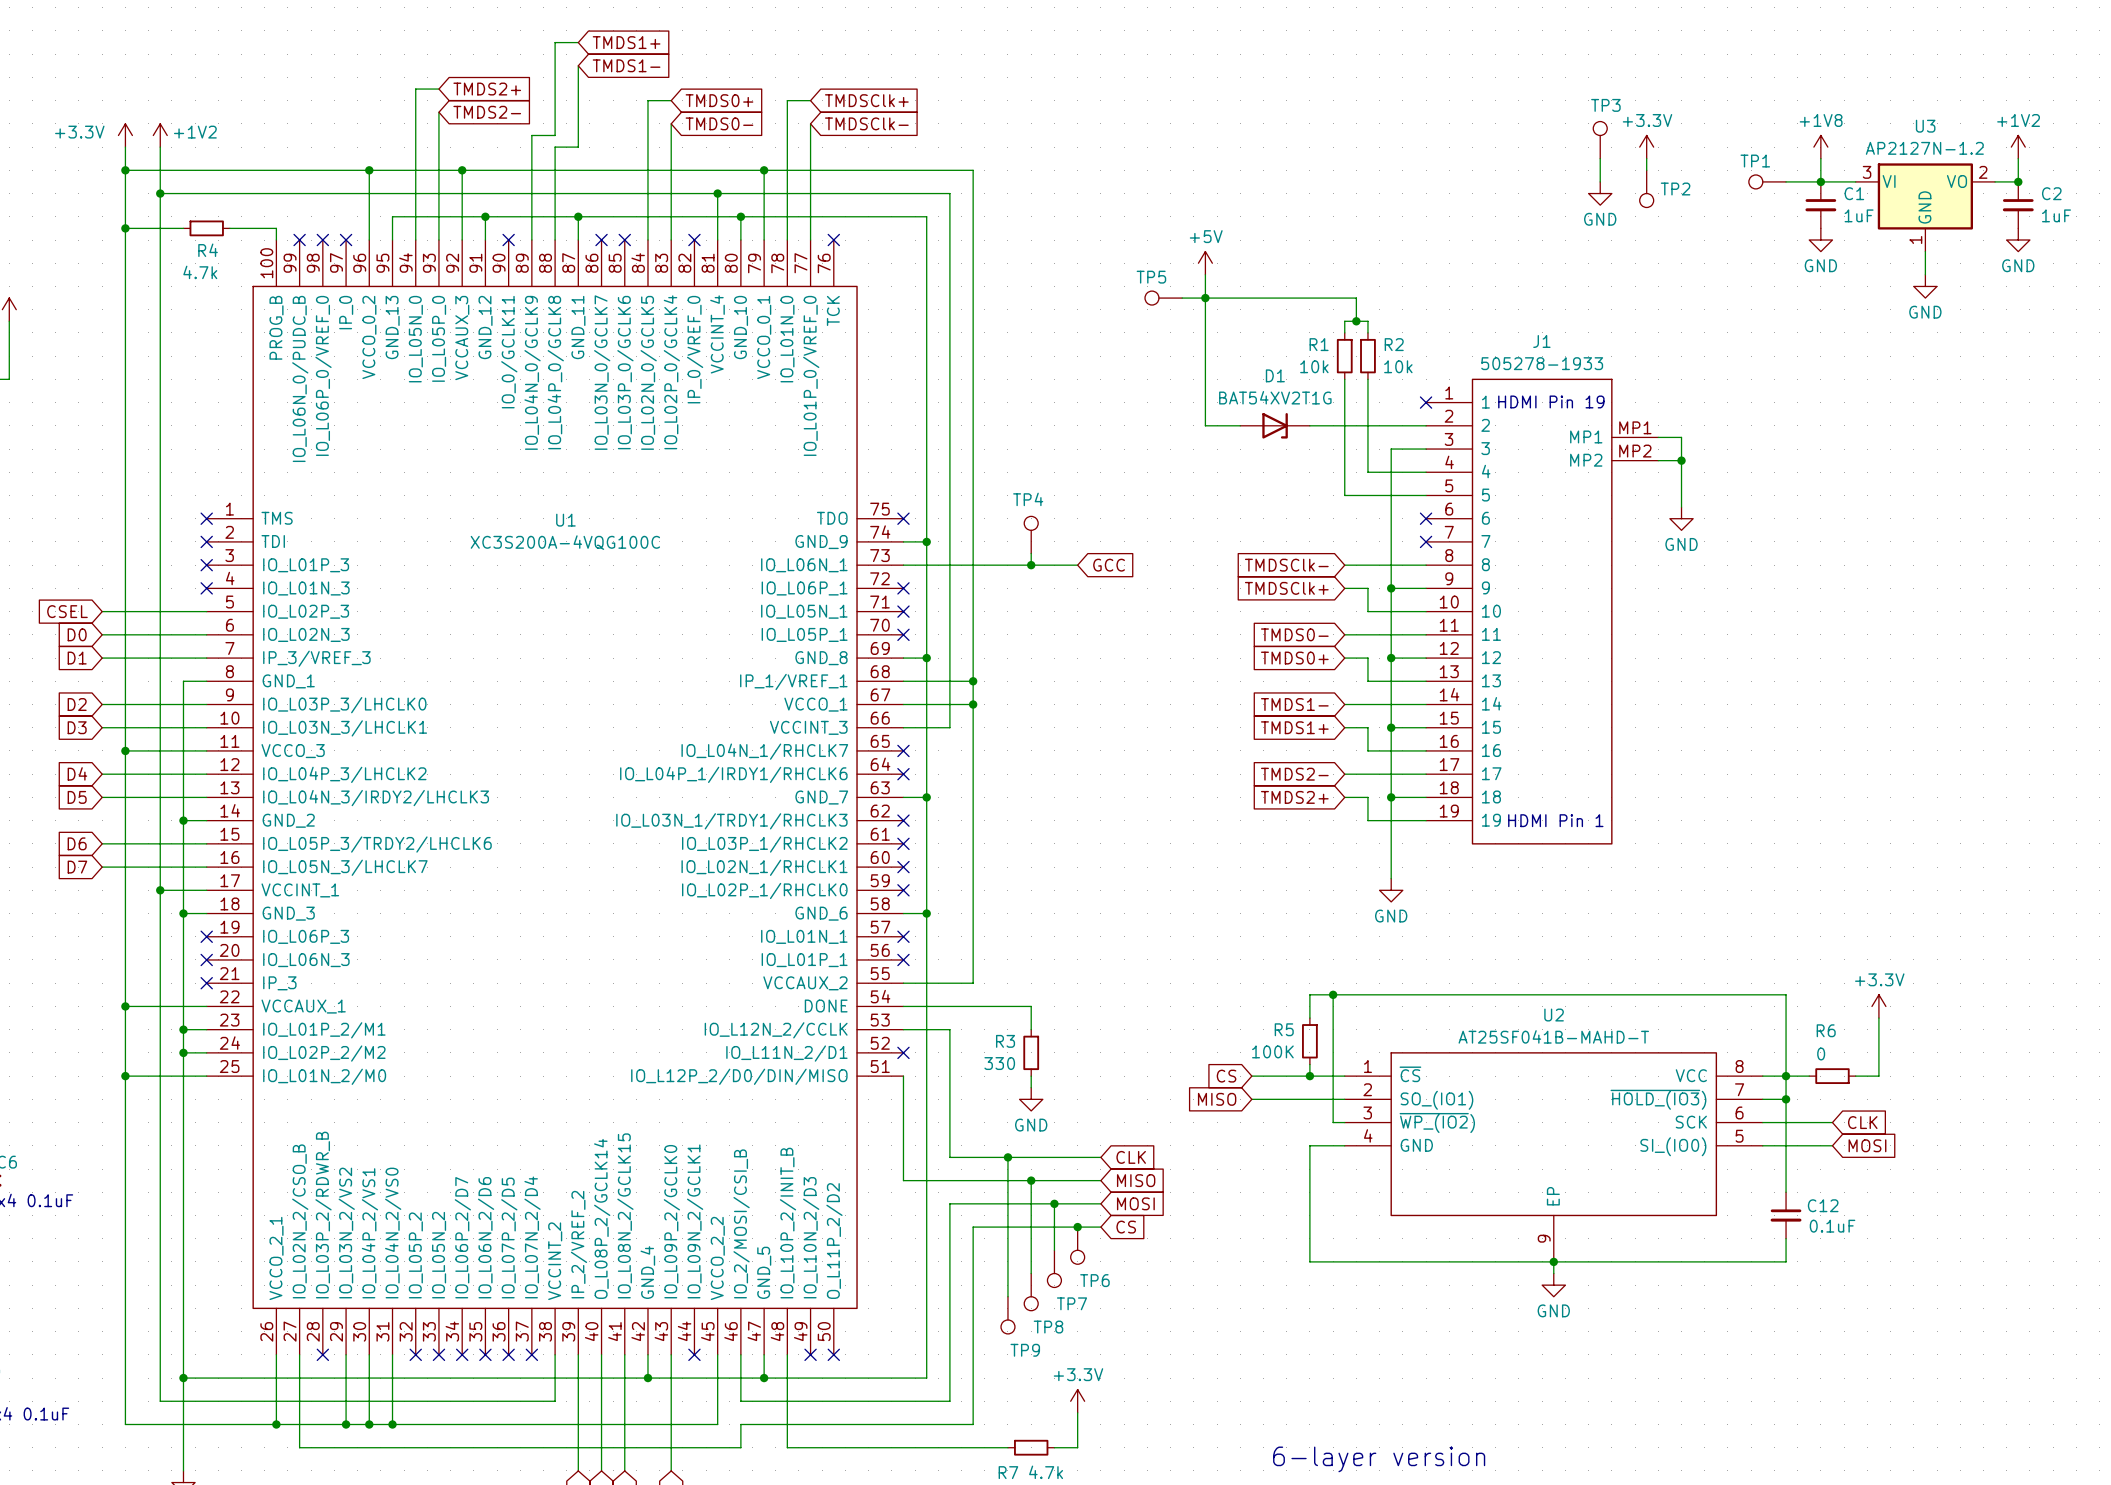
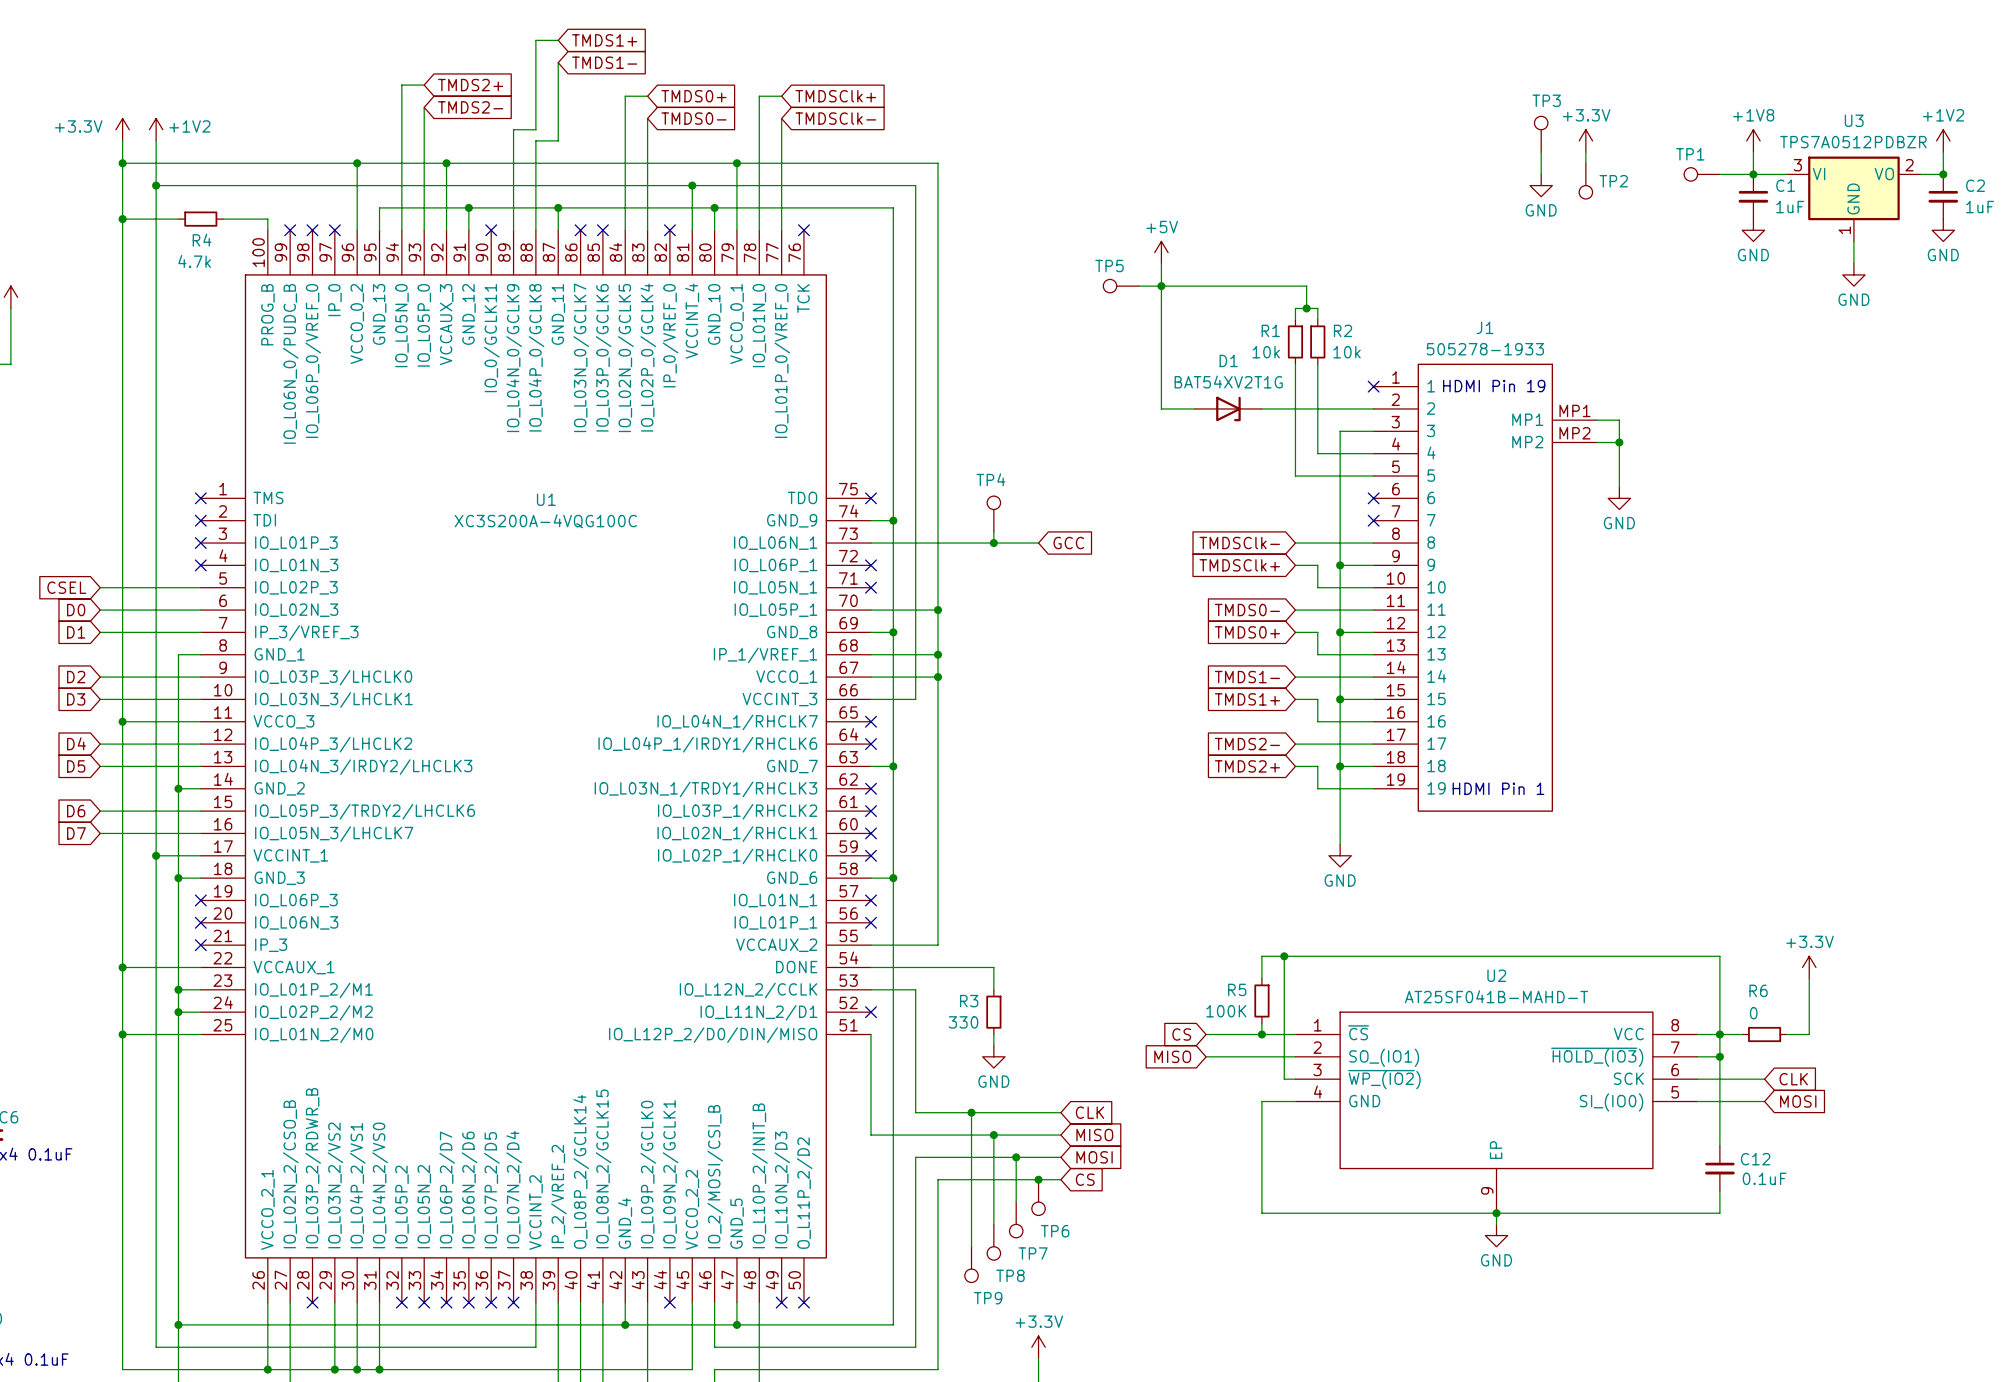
U3 value: AP2127N-1.2 (1924, 148) -> TPS7A0512PDBZR (1853, 142)
wire: none -> (870, 610) (938, 610)
no-connect mark: (903, 634) -> none
junction: none -> (938, 610)

